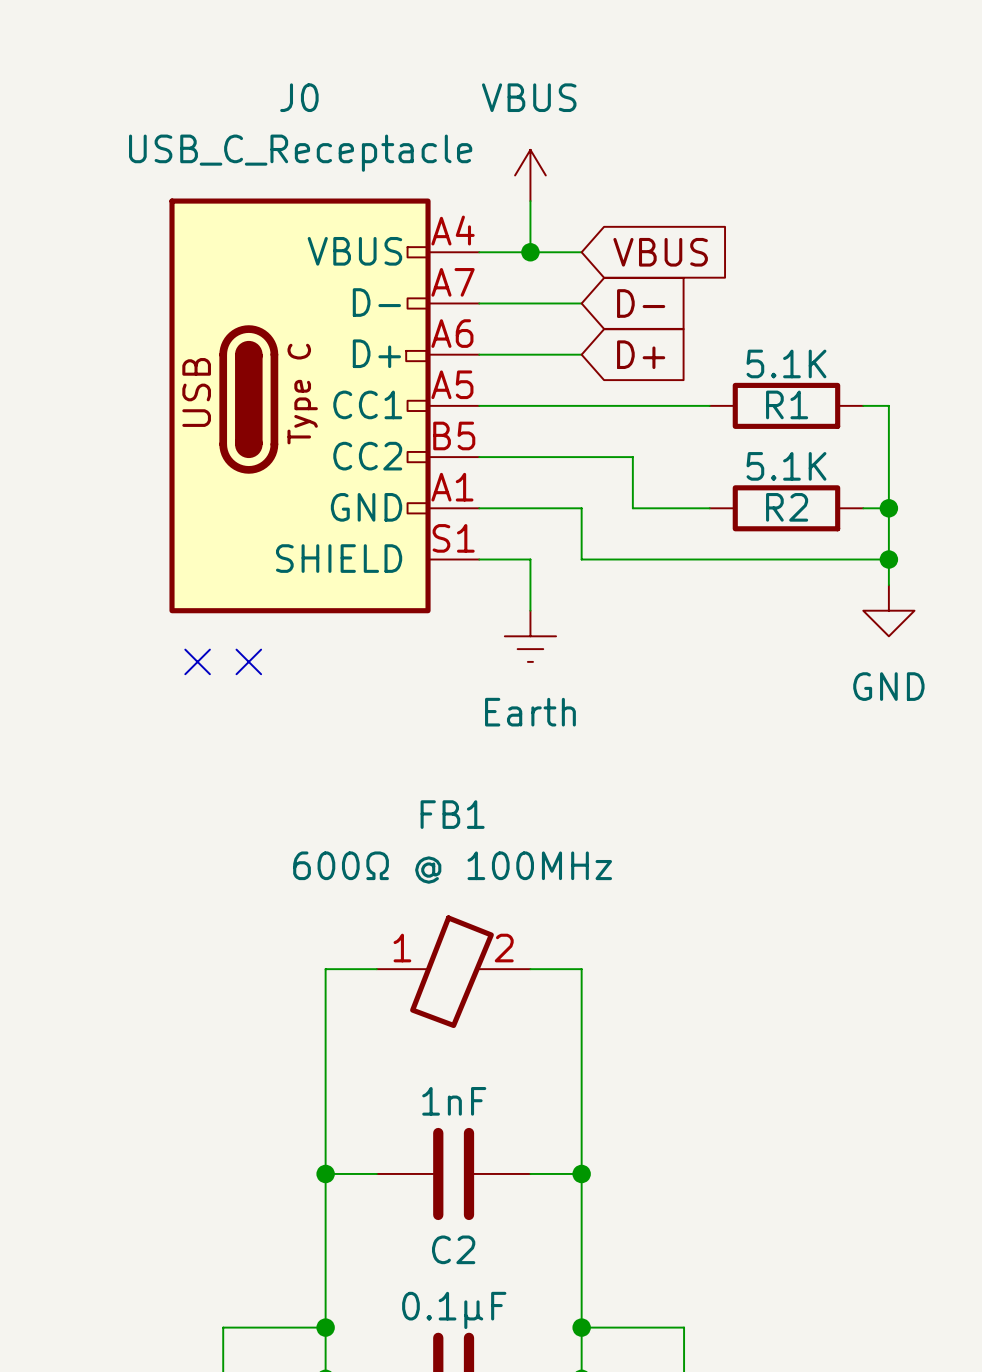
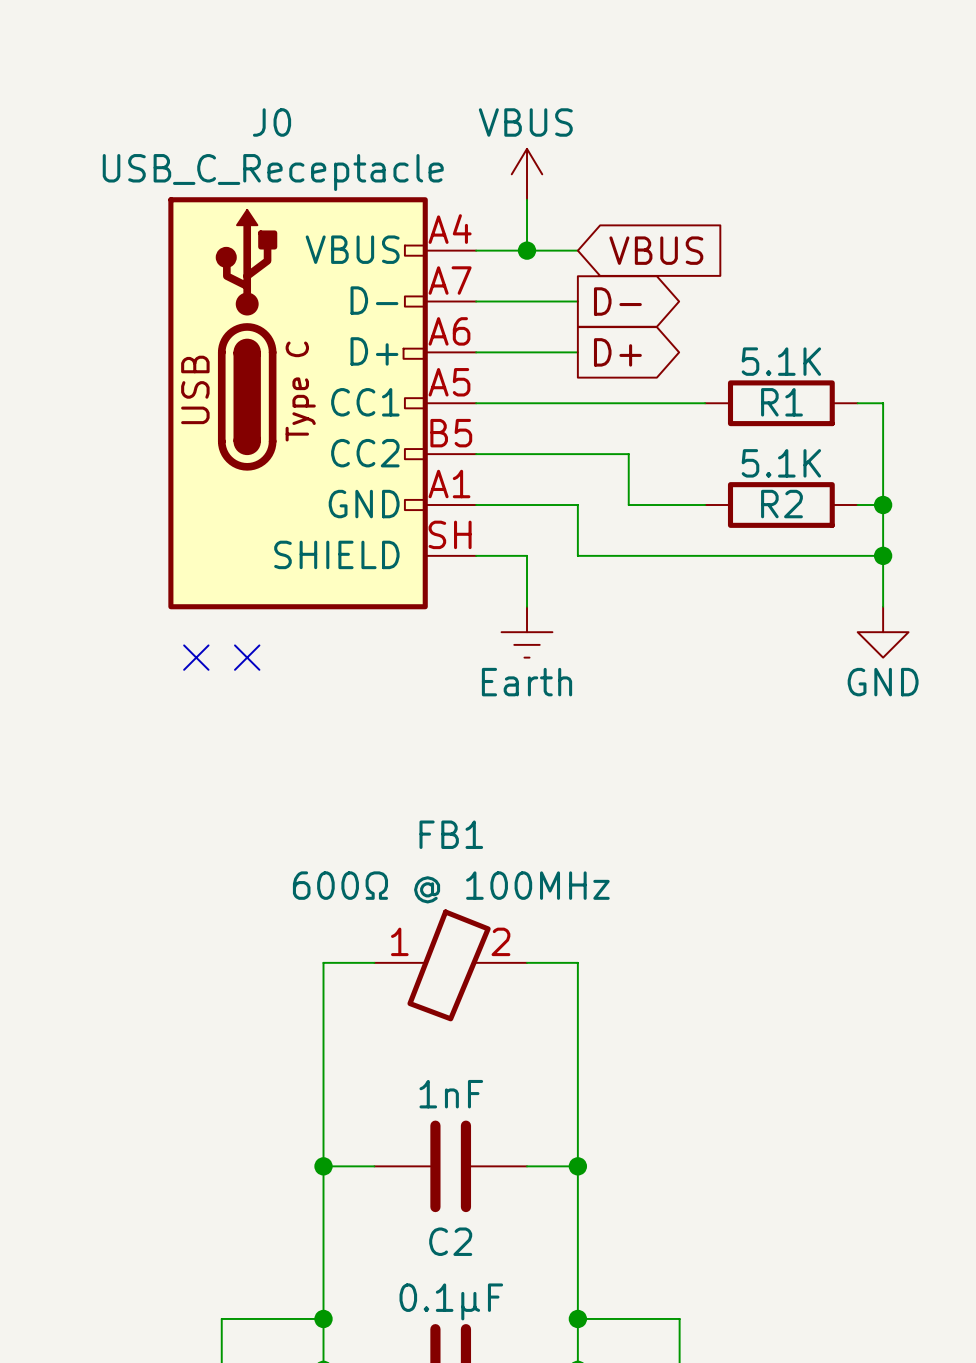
power symbol text position: VBUS (529, 97) -> VBUS (525, 122)
J0 symbol: [169, 198, 480, 614] -> [168, 197, 477, 610]
global label shape: input (641, 303) -> output (617, 301)
global label shape: input (641, 354) -> output (617, 352)
power symbol position: GND (888, 610) -> GND (883, 632)
power symbol text position: Earth (530, 712) -> Earth (527, 682)
FB1 name position: FB1 (452, 814) -> FB1 (451, 834)
FB1 value position: 600Ω @ 100MHz (452, 867) -> 600Ω @ 100MHz (451, 887)

